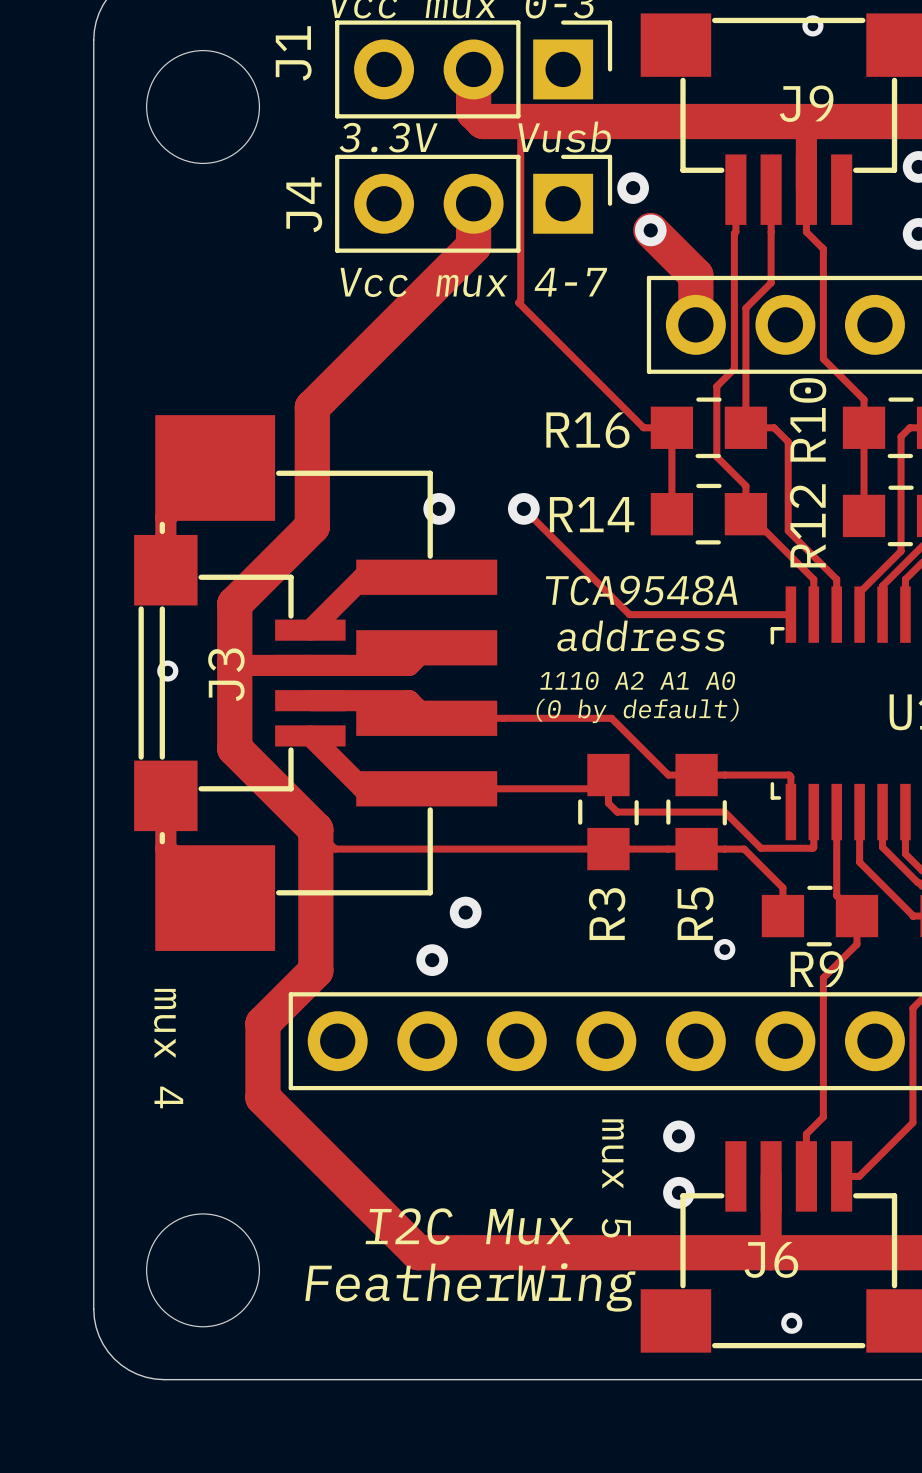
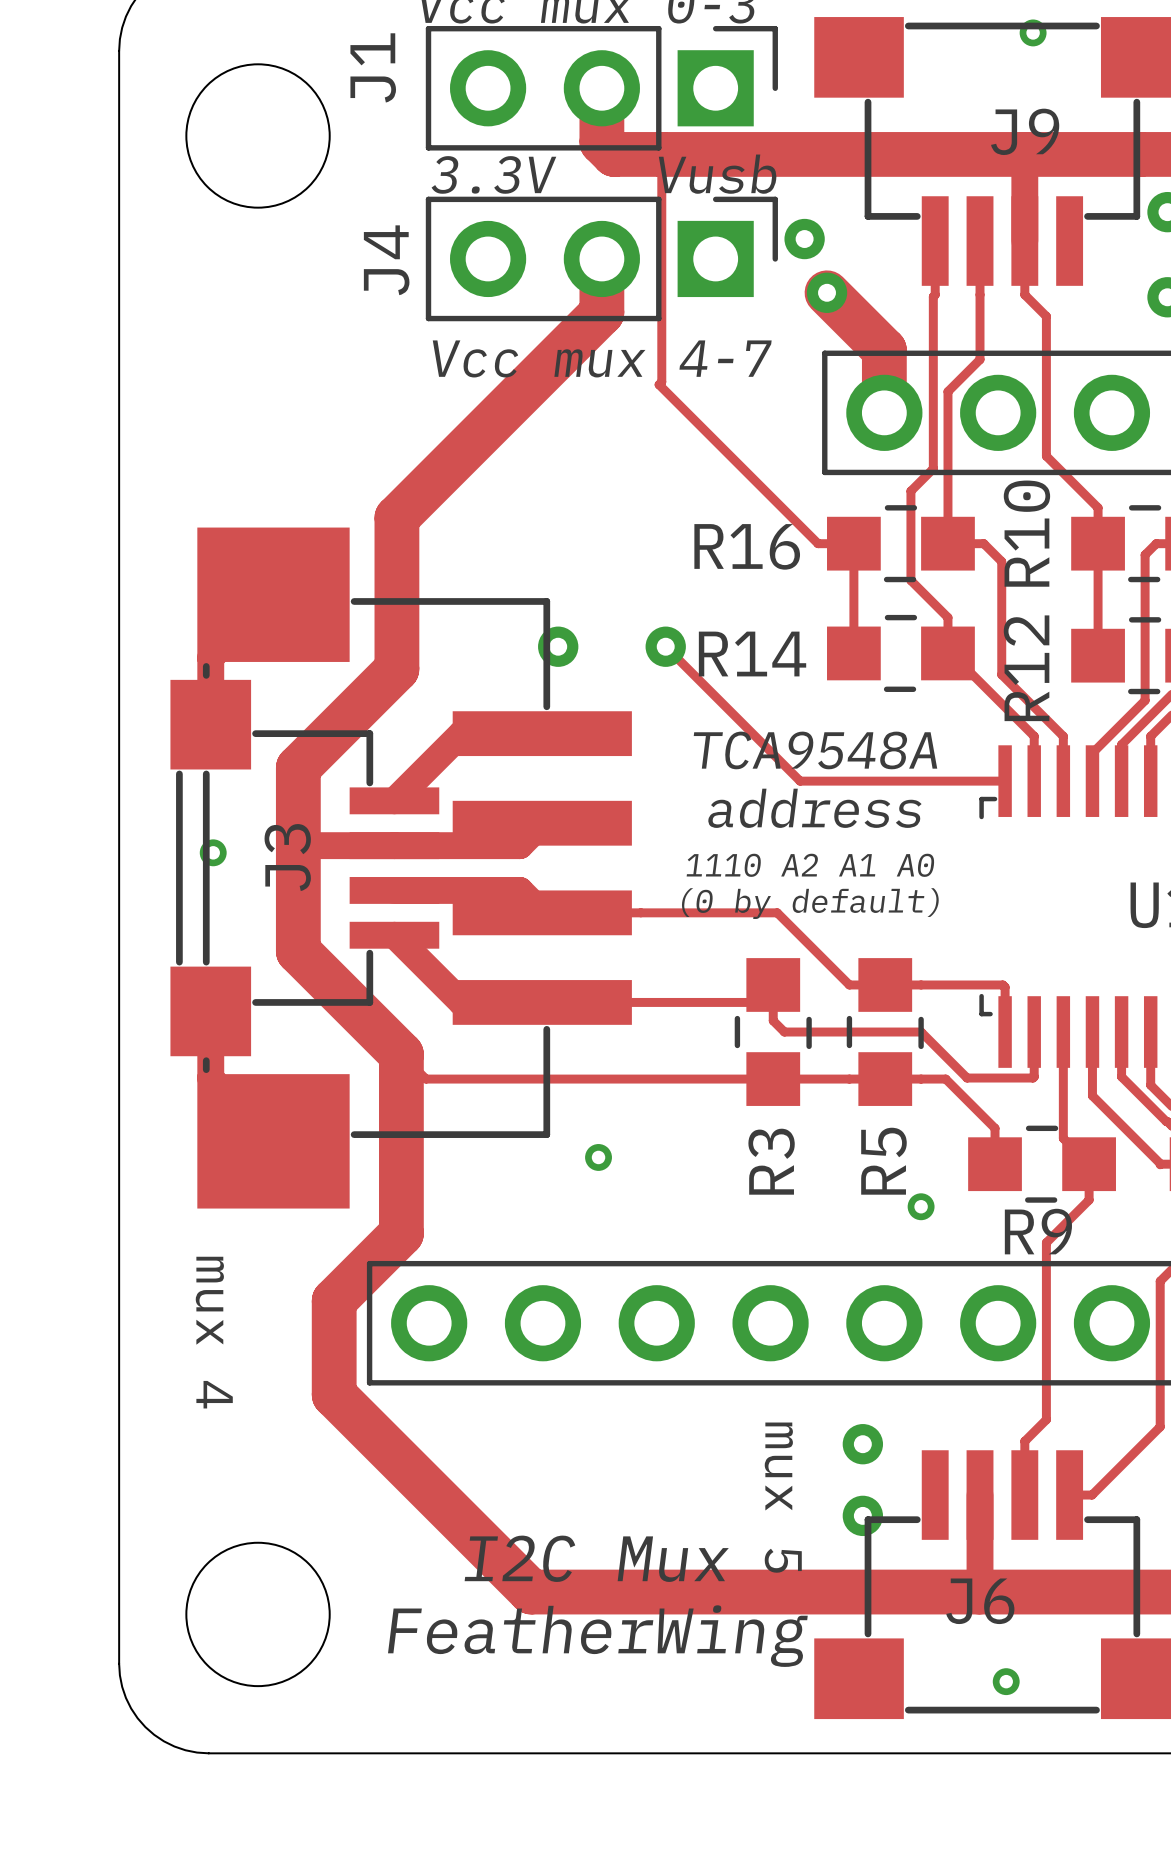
via size: [449, 896, 482, 929] -> [585, 1144, 612, 1171]
via: (432, 960) -> none

